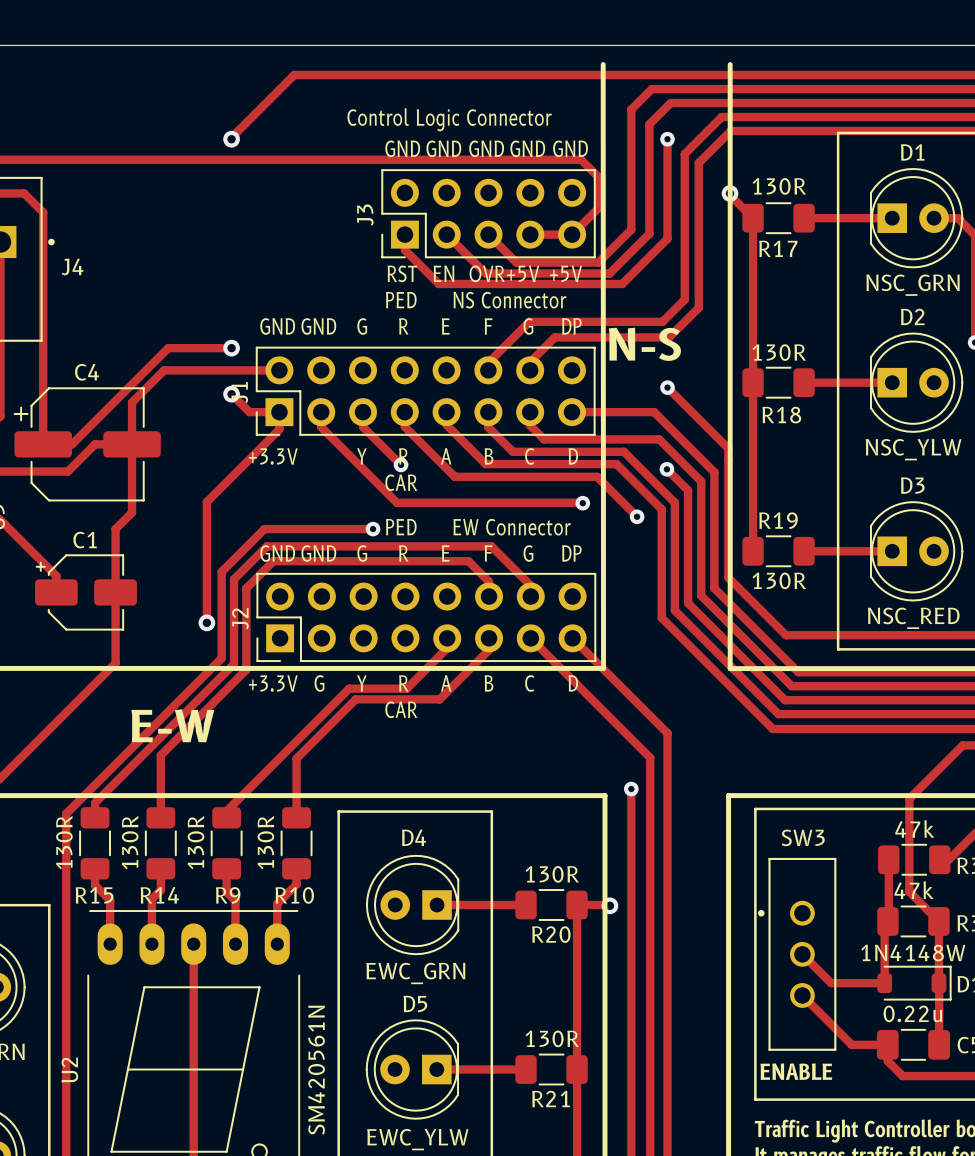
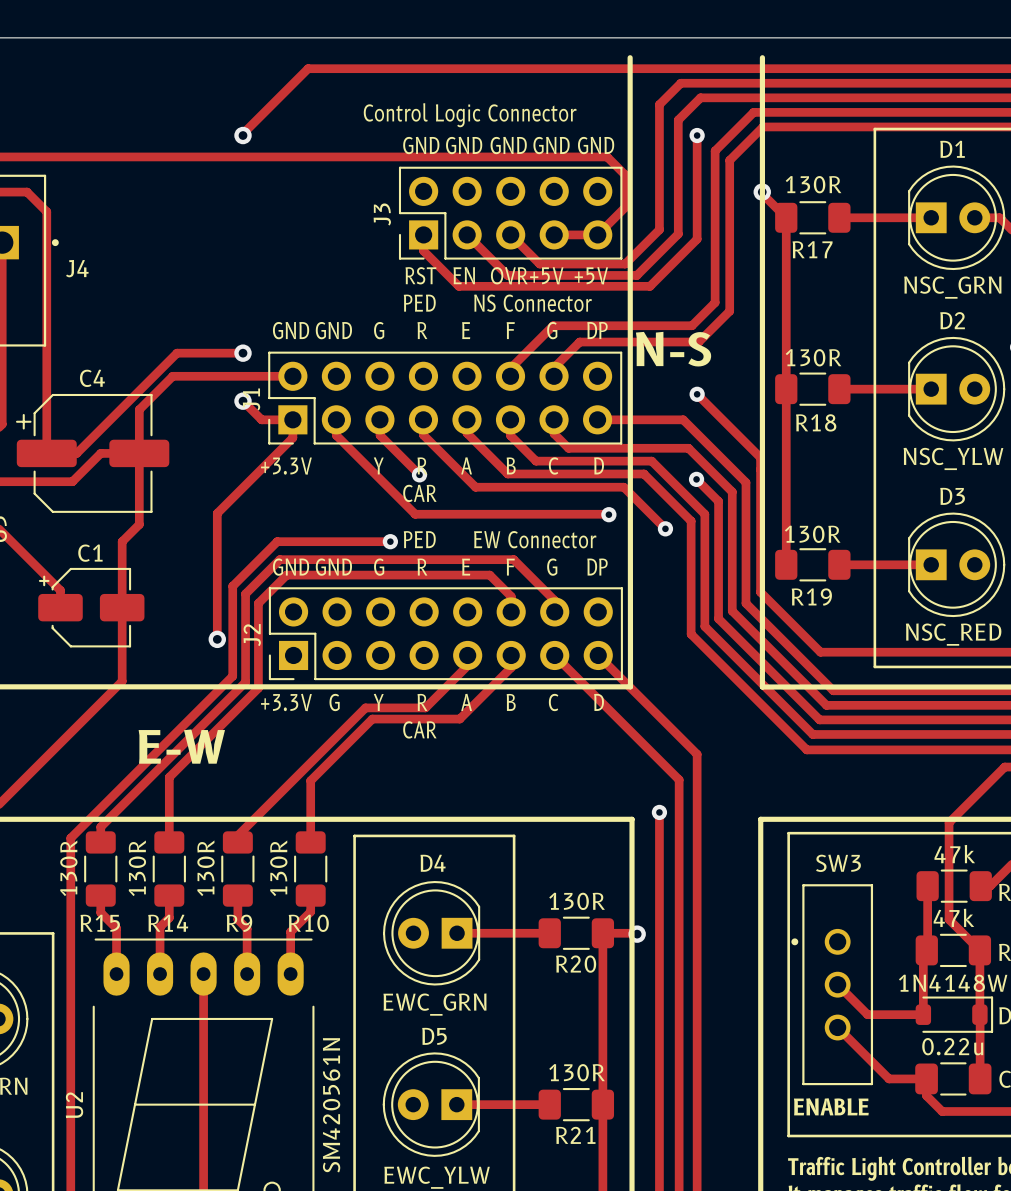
R19 name position: R19 (778, 520) -> R19 (811, 597)
R19 value position: 130R (779, 580) -> 130R (812, 534)

